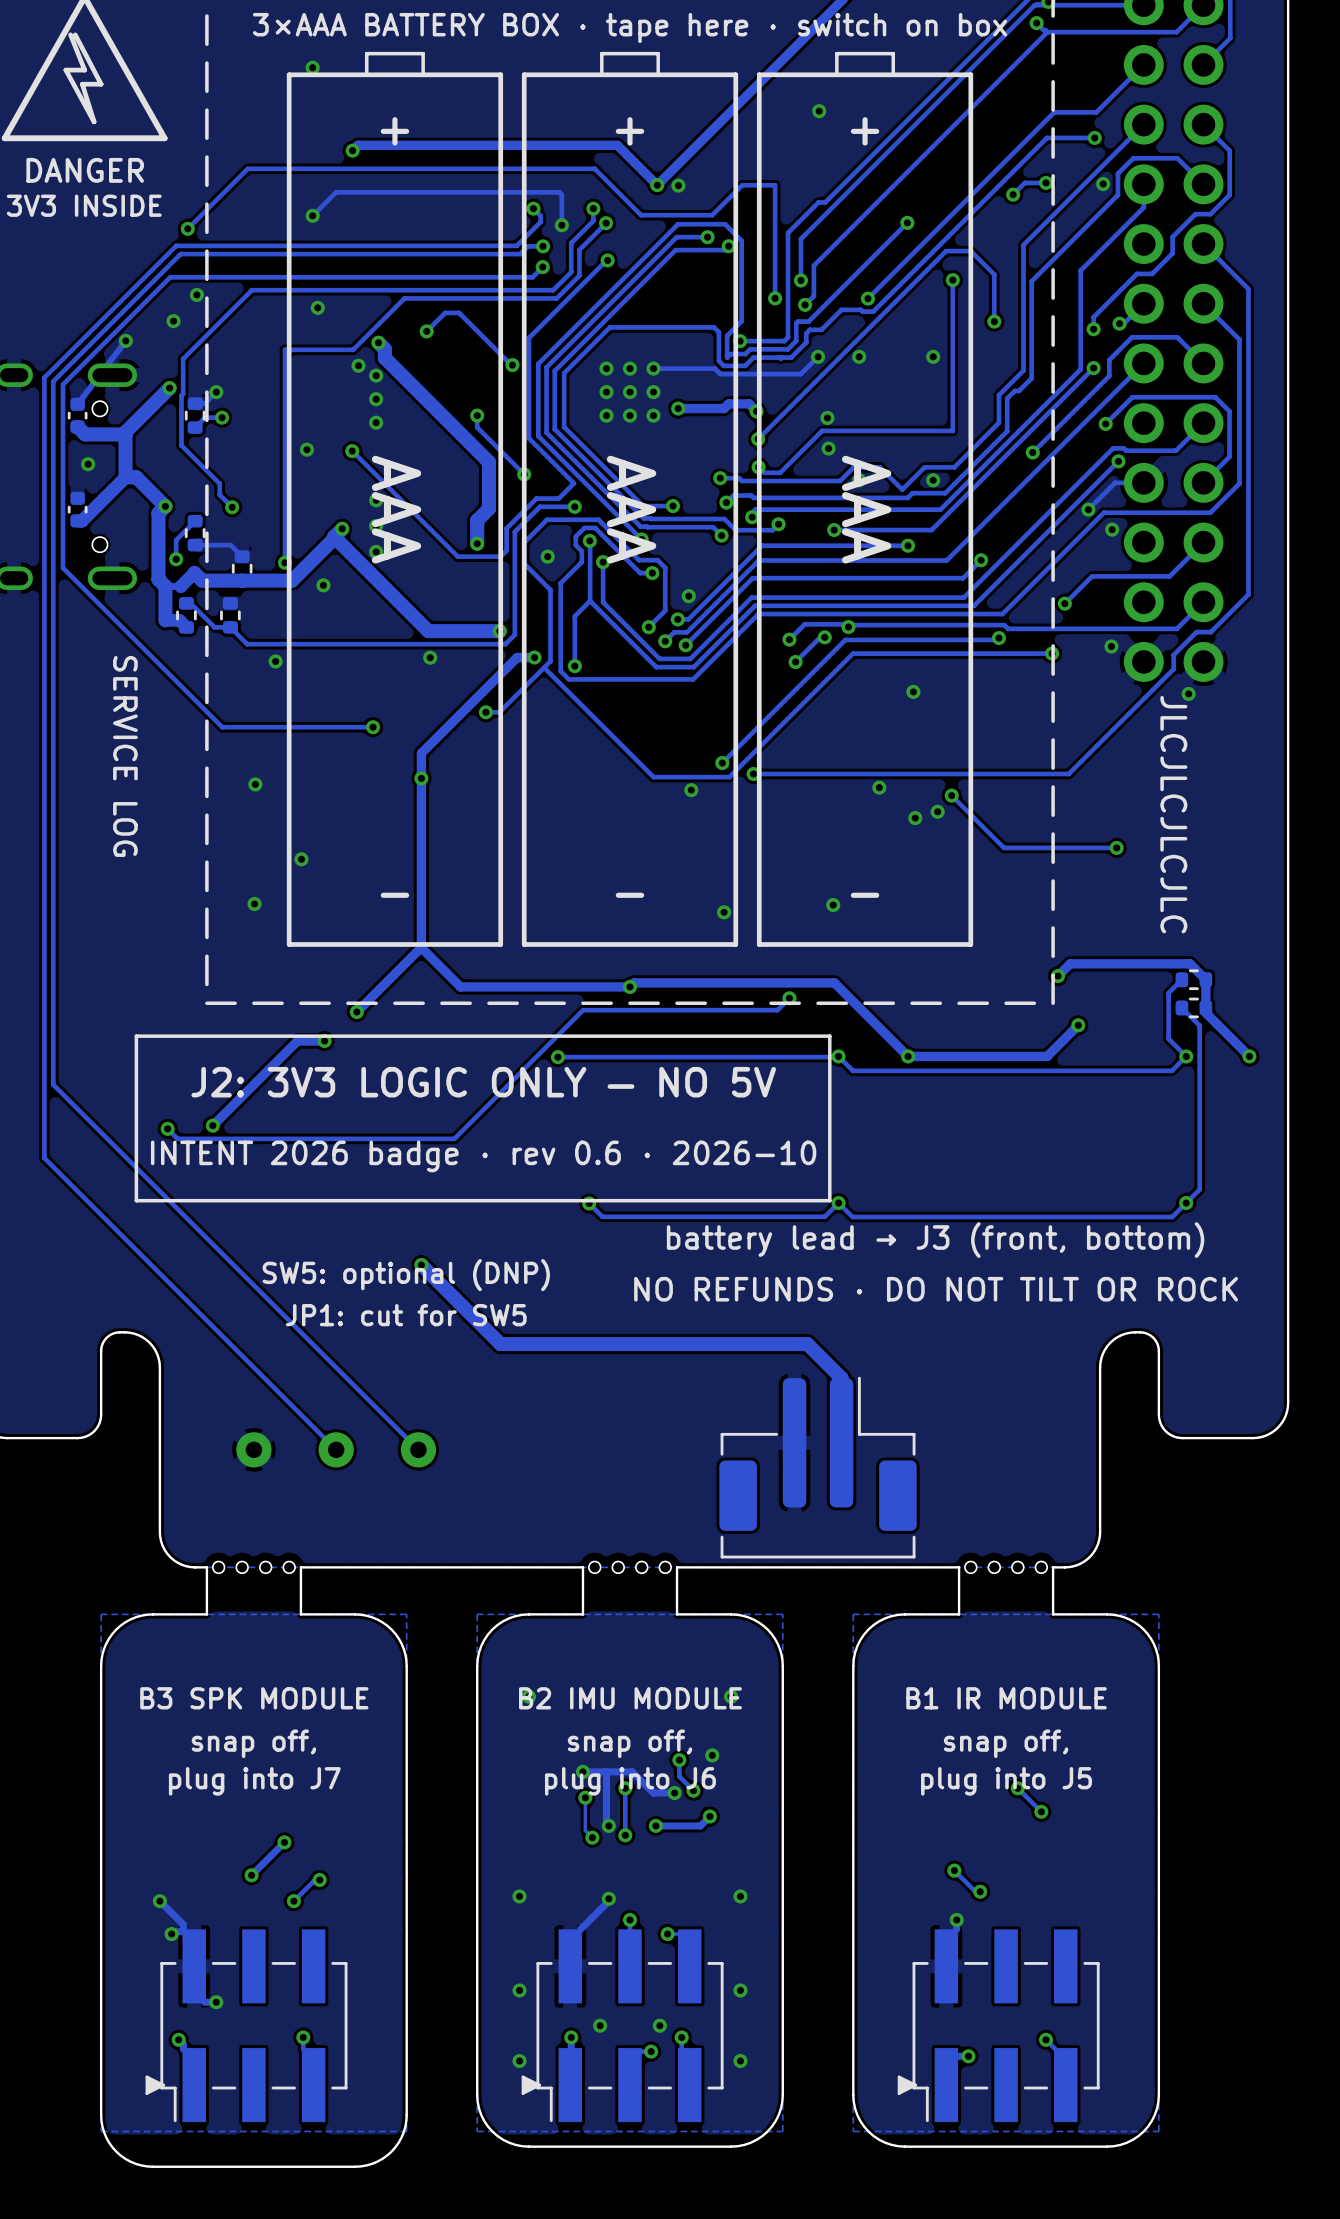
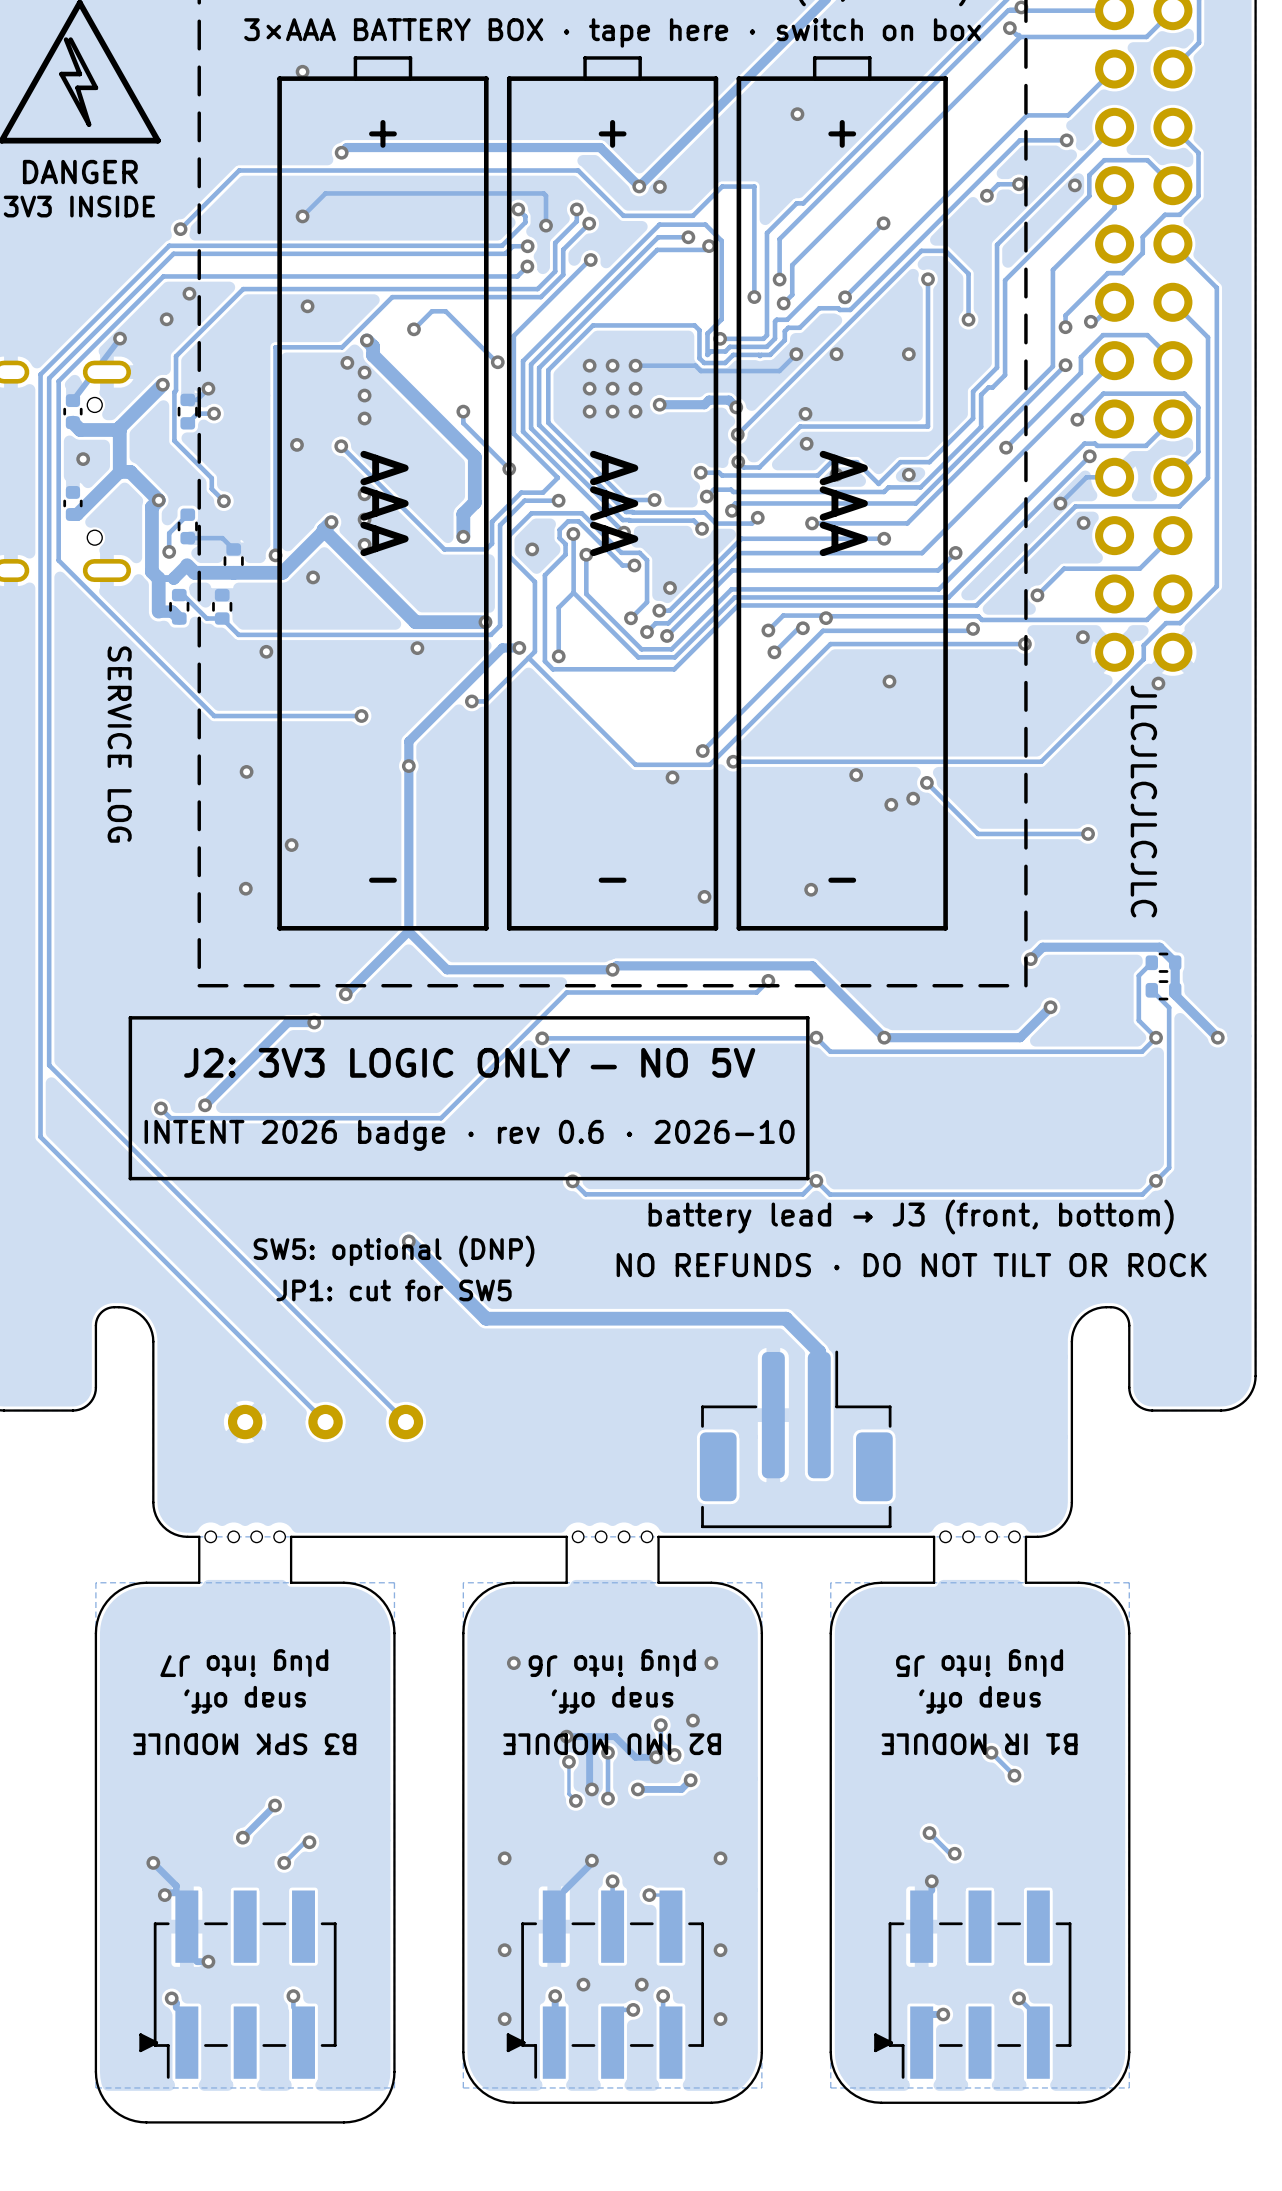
text: B3 SPK MODULE (254, 1698) -> plug into J7 (244, 1663)
text: B2 IMU MODULE (630, 1698) -> plug into J6 (612, 1663)
text: B1 IR MODULE (1006, 1698) -> plug into J5 (979, 1663)
text rotation: 0° (253, 1743) -> 180° (245, 1699)
text rotation: 0° (630, 1743) -> 180° (612, 1699)
text rotation: 0° (1006, 1743) -> 180° (980, 1699)
text: plug into J7 (254, 1781) -> B3 SPK MODULE (244, 1744)
text: plug into J6 (630, 1781) -> B2 IMU MODULE (612, 1744)
text: plug into J5 (1006, 1781) -> B1 IR MODULE (979, 1744)

